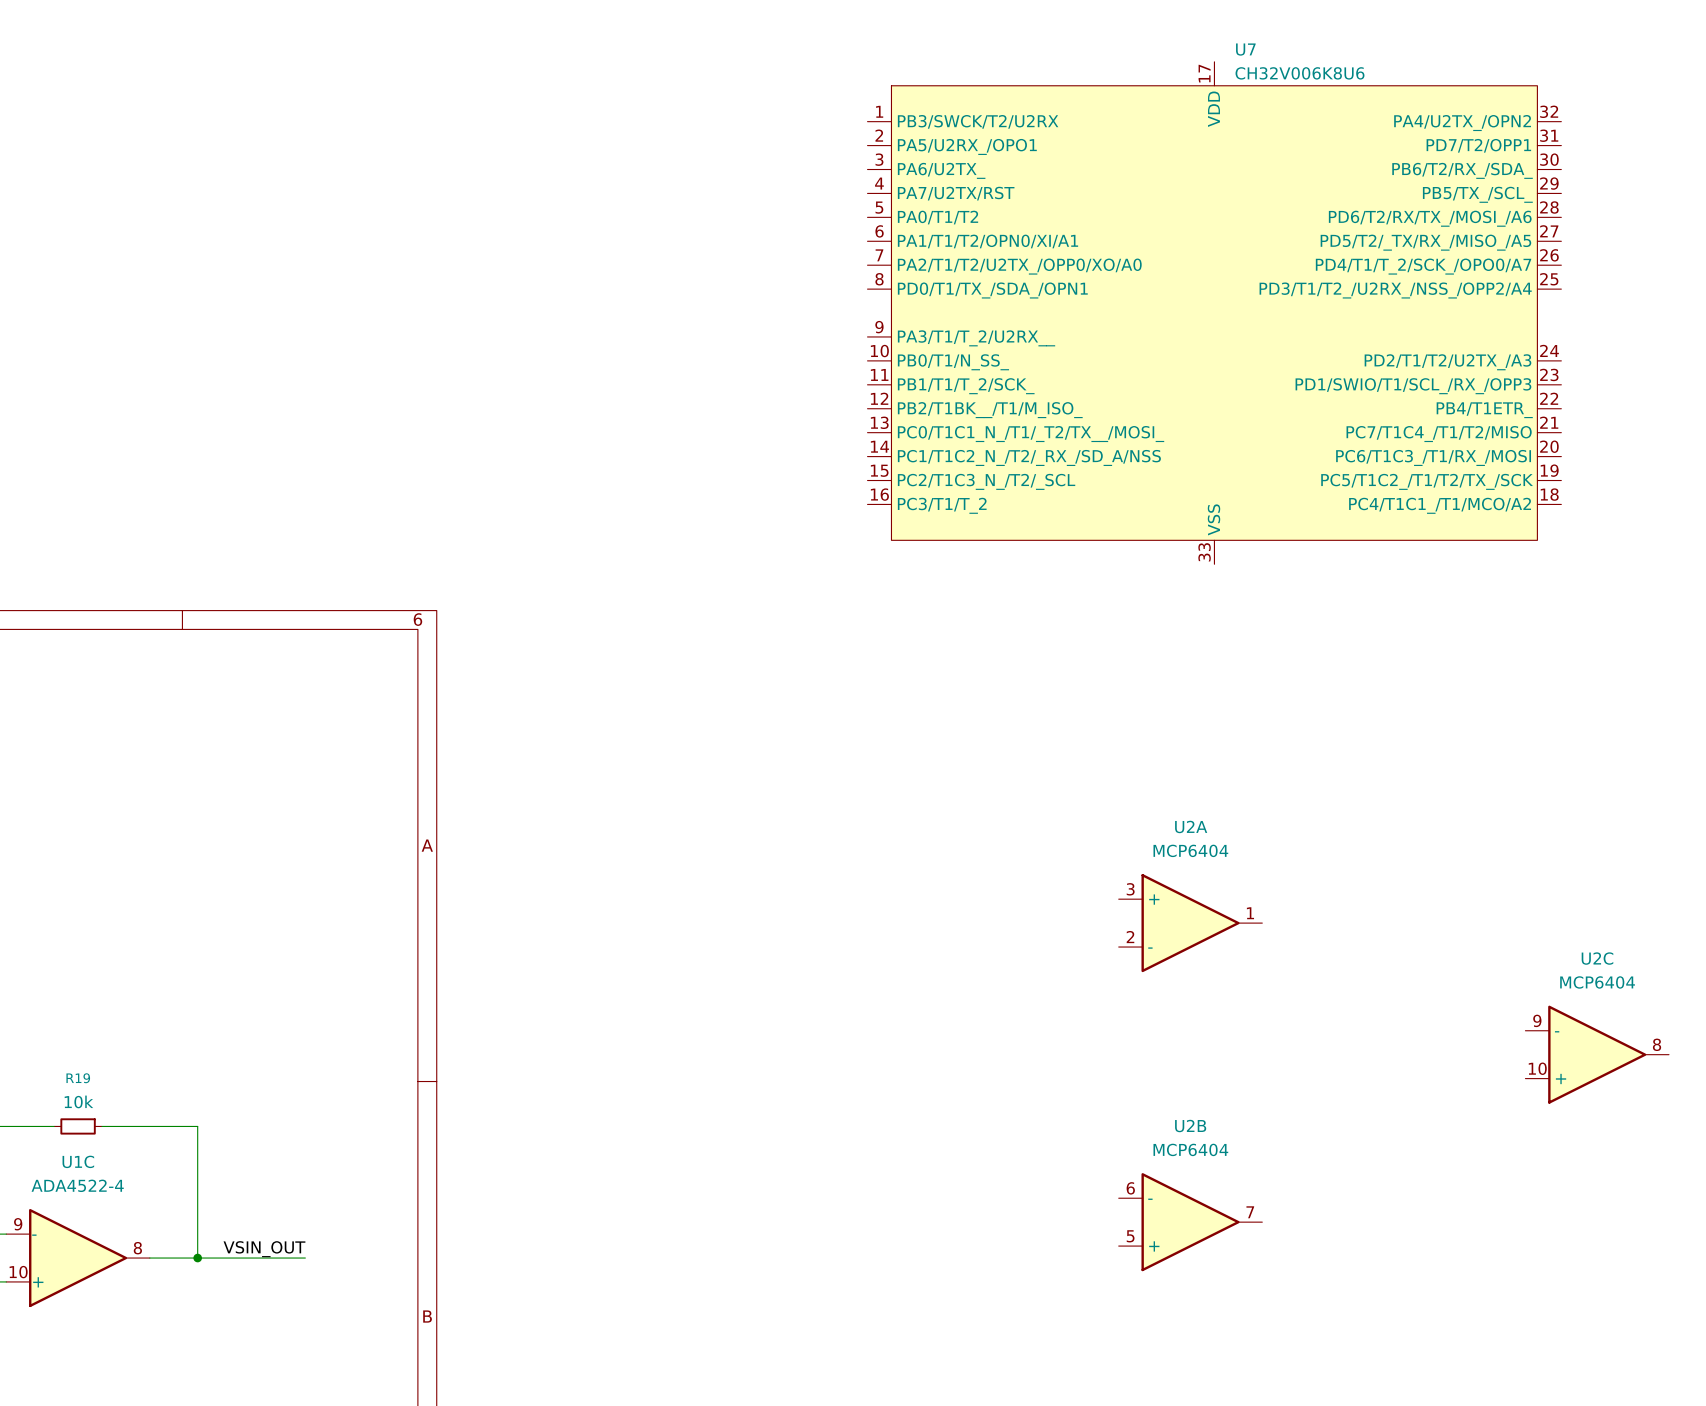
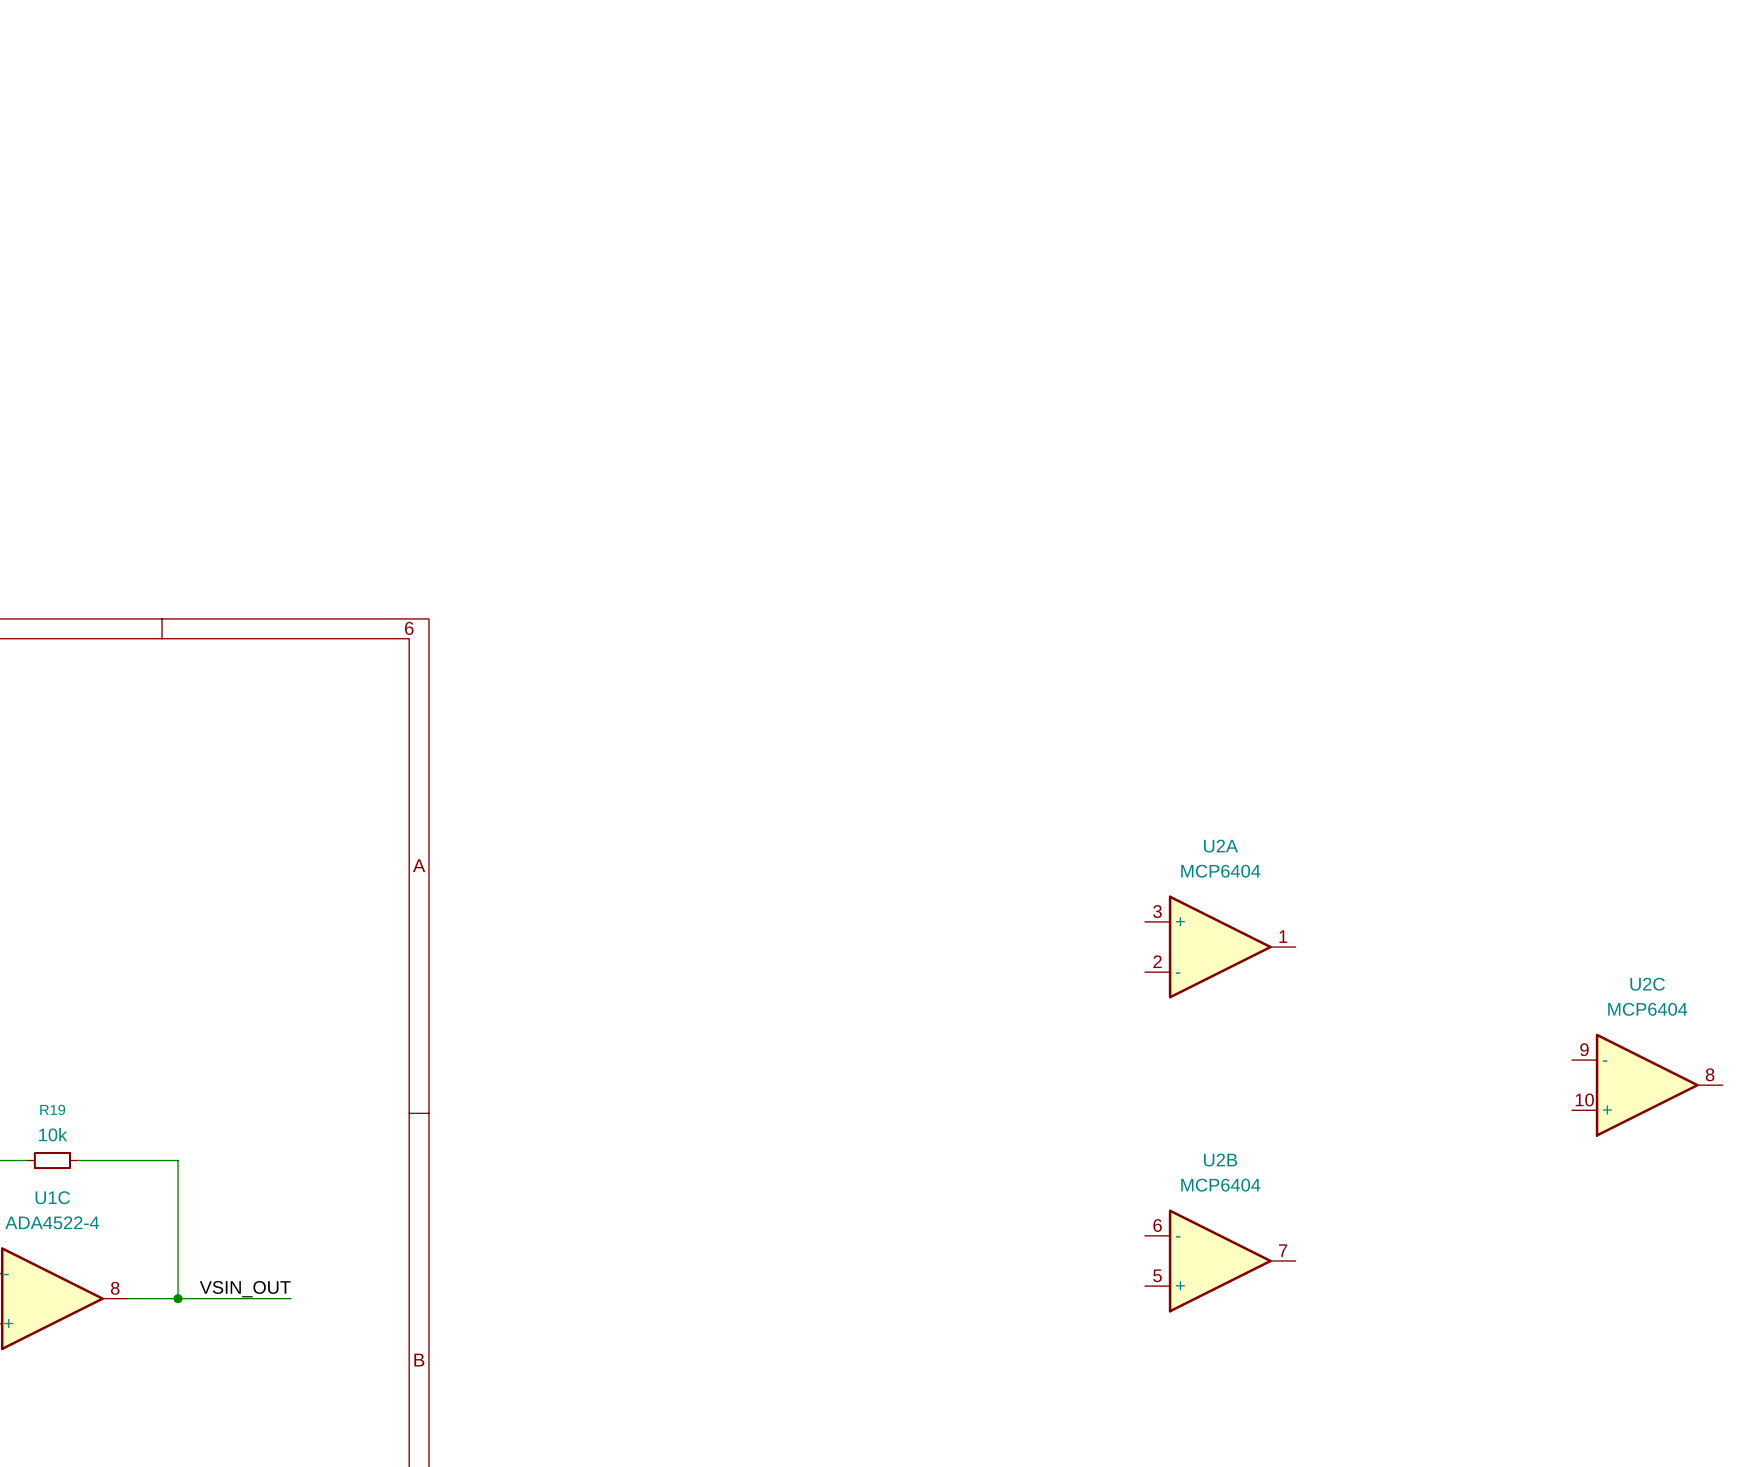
U7: CH32V006K8U6 (1214, 313) -> none

